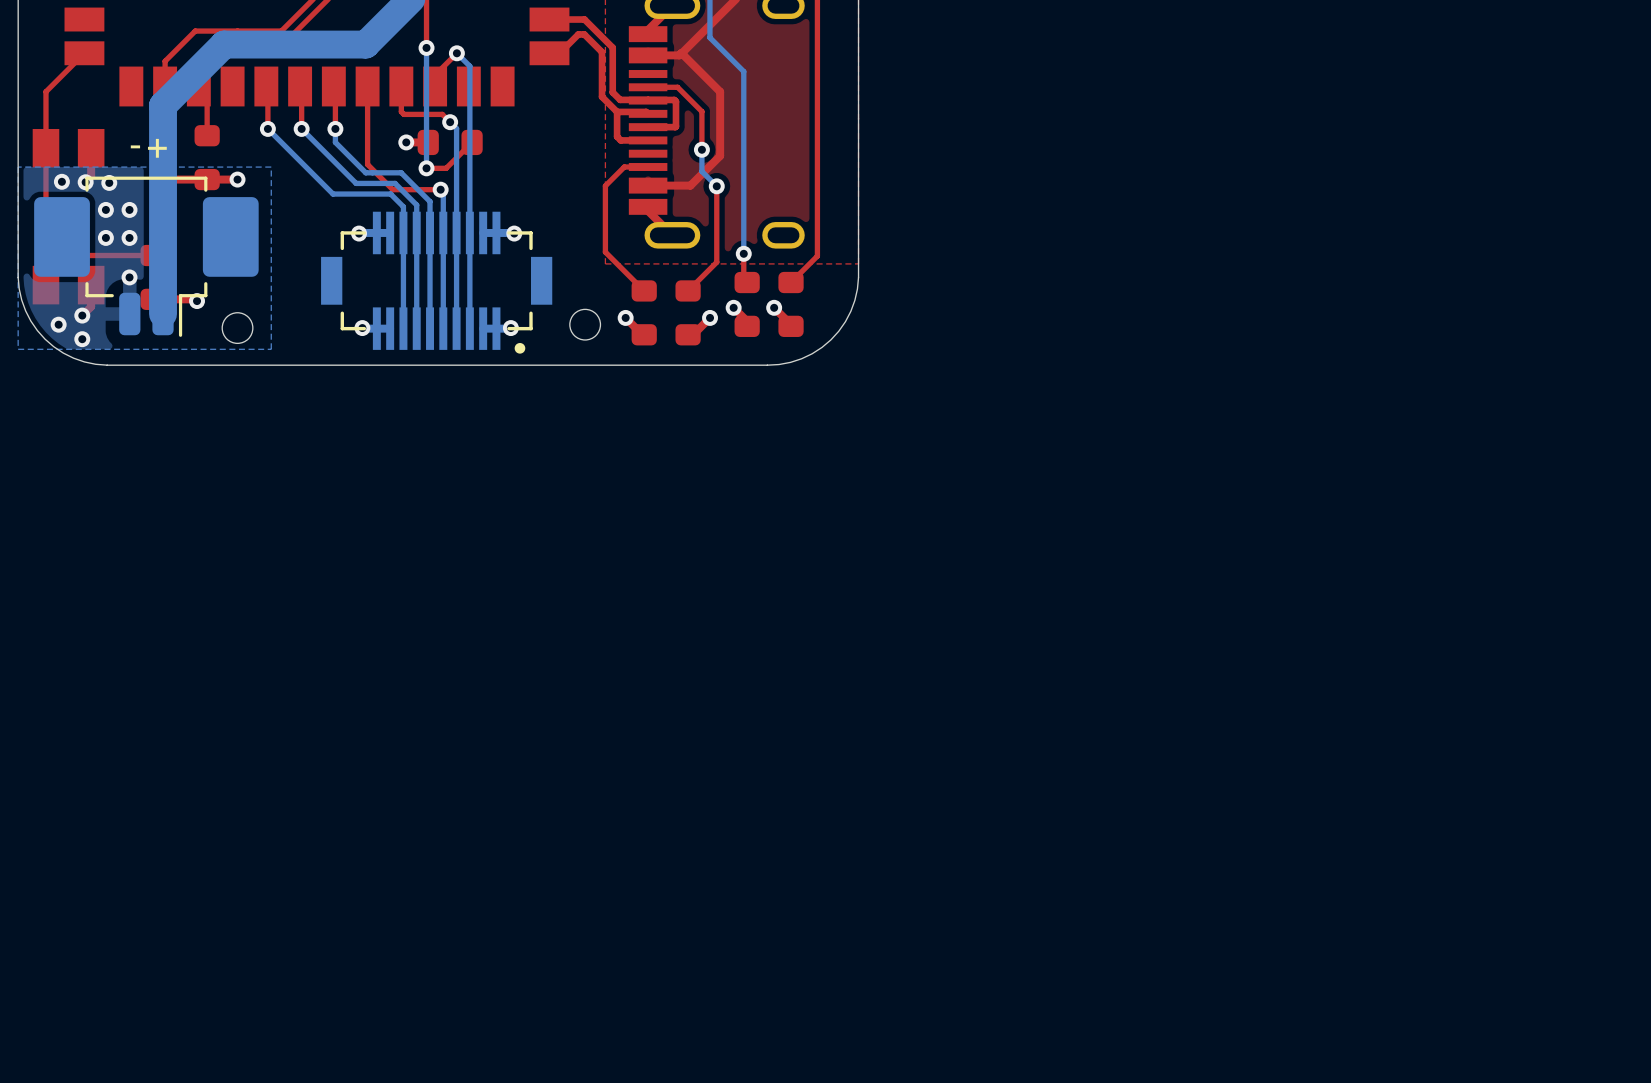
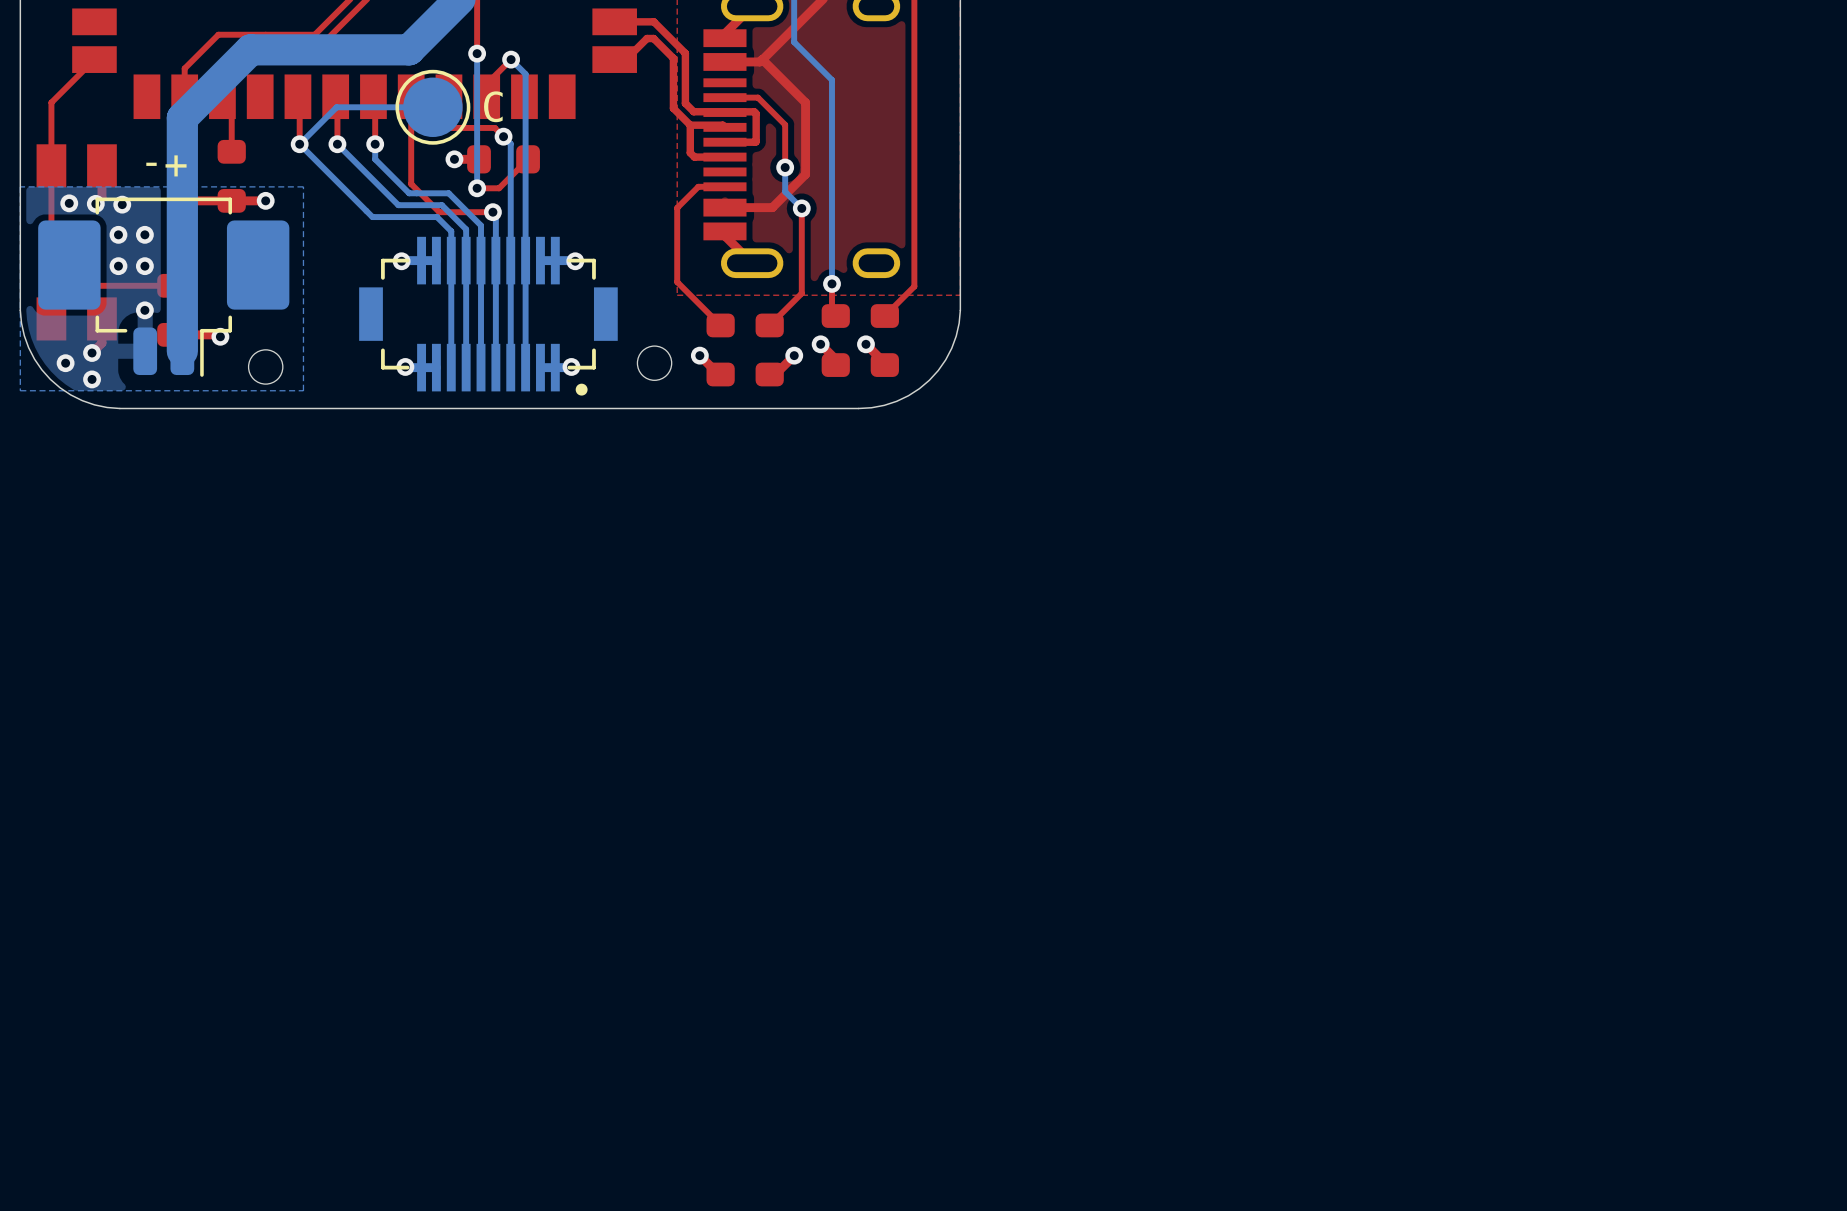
bottom track: none -> (432, 107) (336, 107) (299, 144)
part: none -> (432, 107)
text: none -> C (493, 106)

